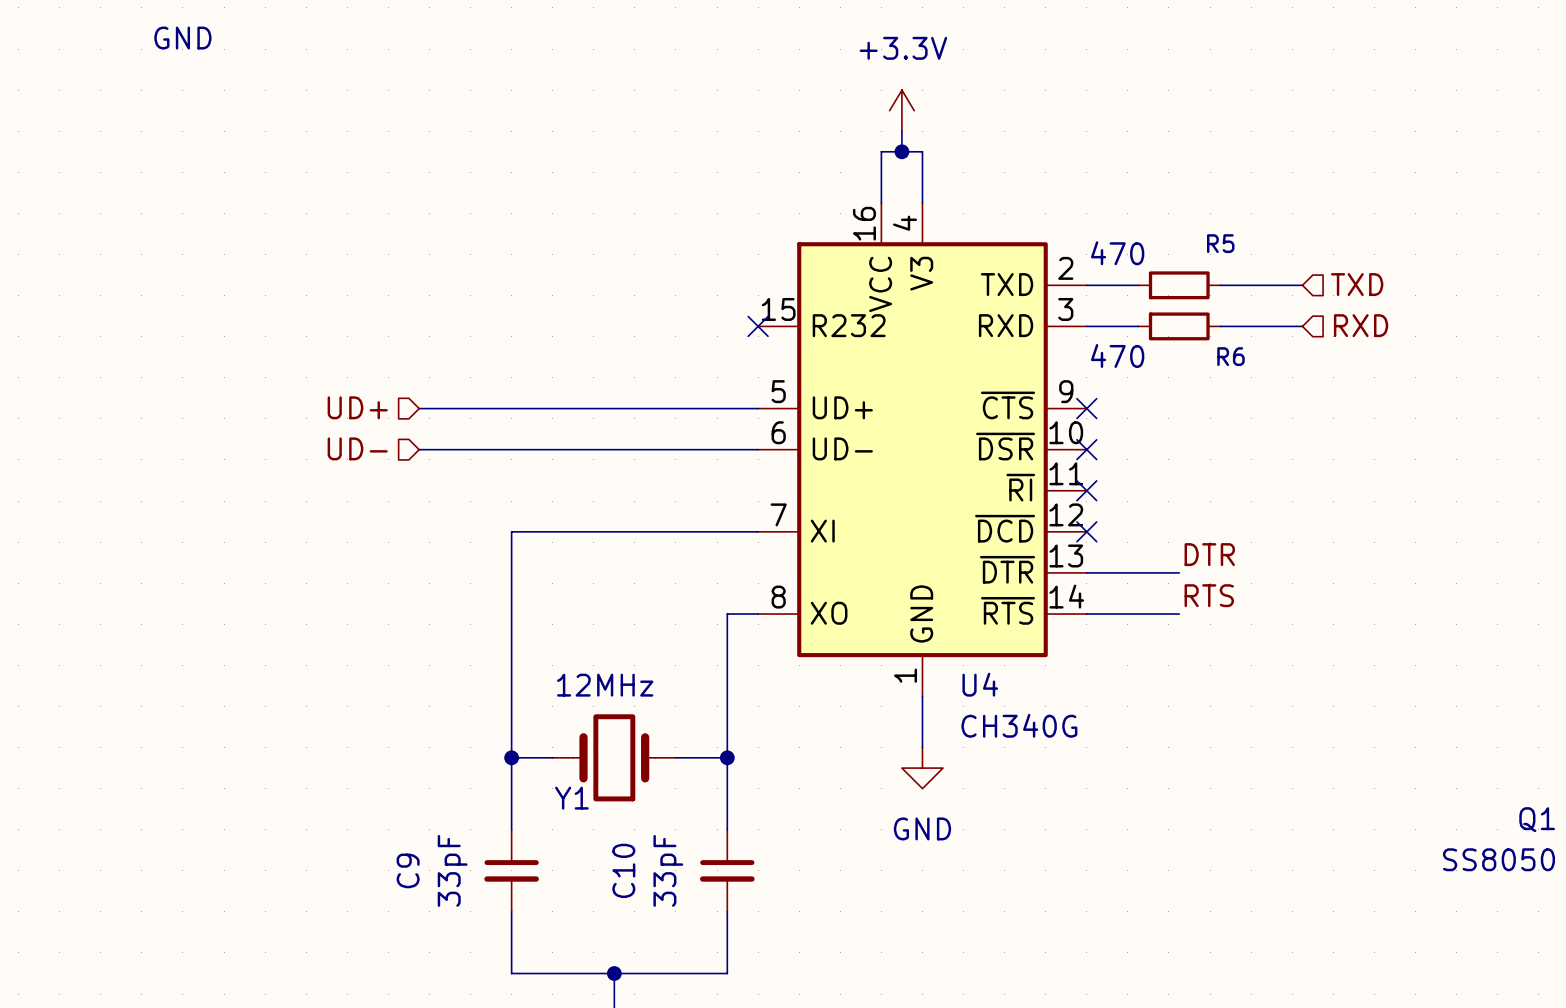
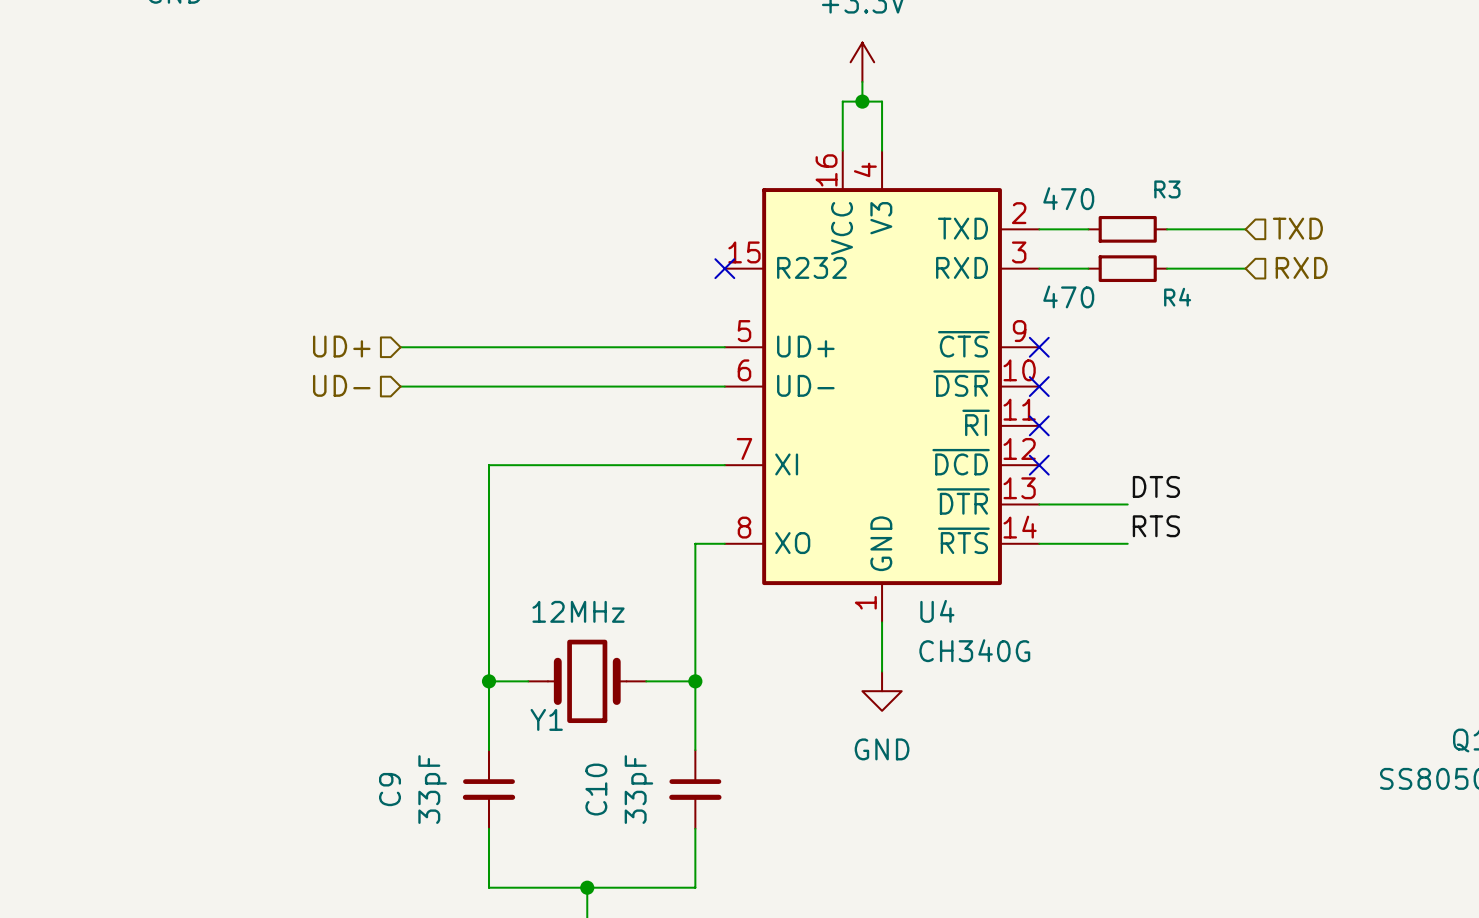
R5 name: R5 (1220, 243) -> R3 (1167, 189)
R6 name: R6 (1231, 356) -> R4 (1177, 297)
label: DTR (1209, 554) -> DTS (1156, 486)

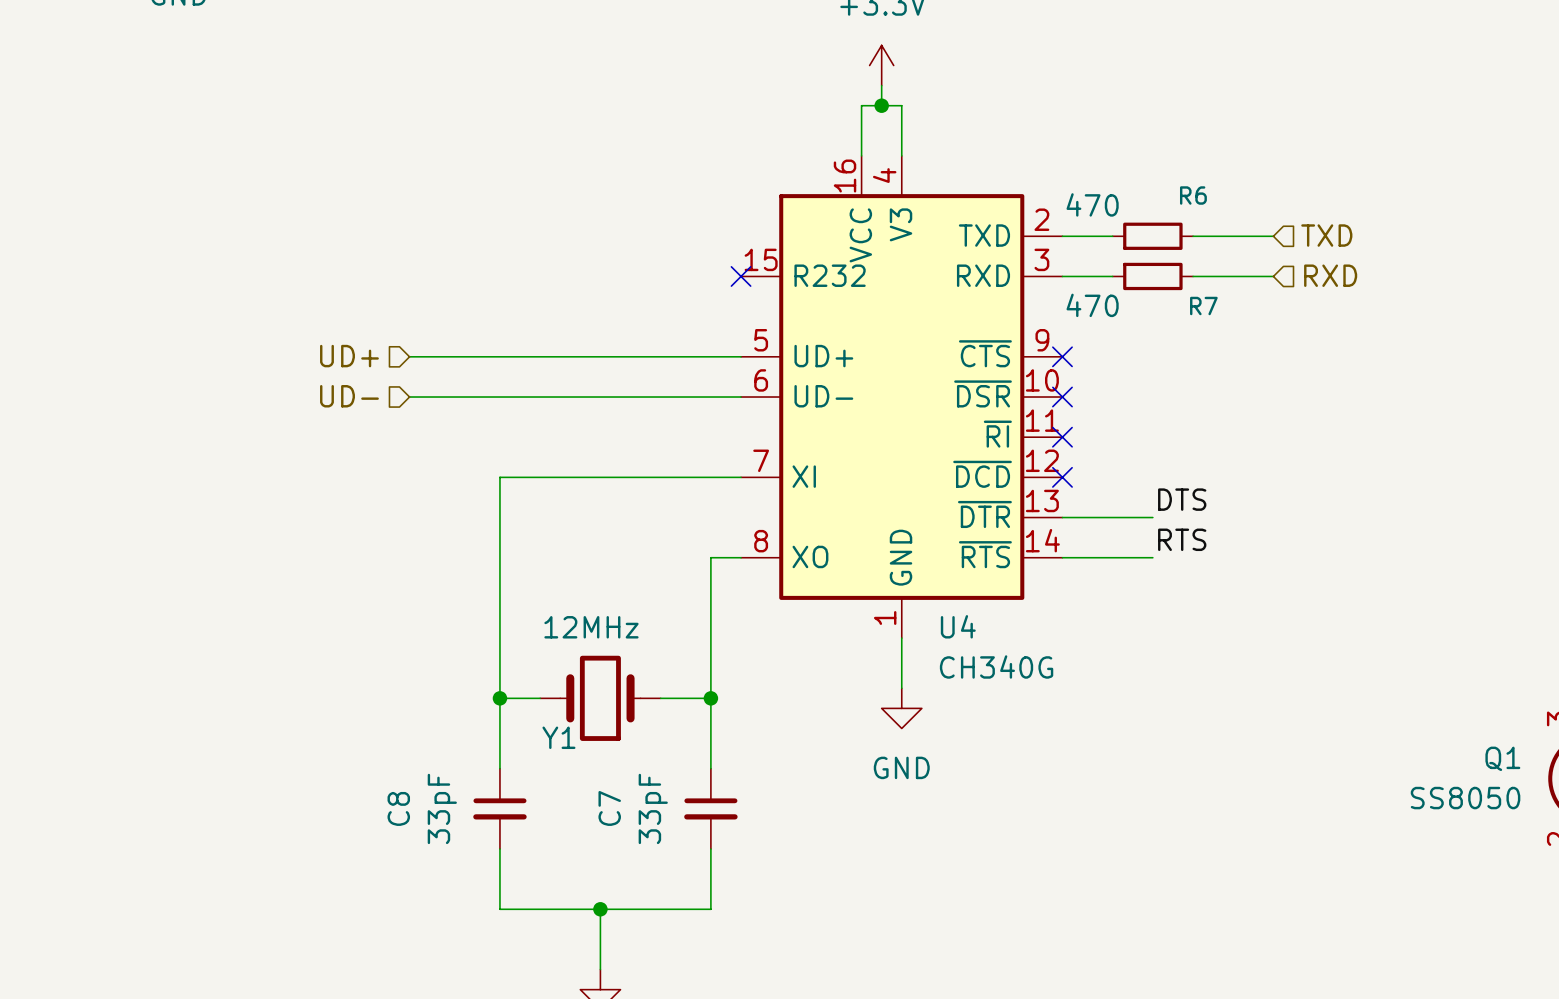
R3 name: R3 (1167, 189) -> R6 (1193, 195)
R4 name: R4 (1177, 297) -> R7 (1203, 306)
C9 name: C9 (390, 789) -> C8 (398, 808)
C10 name: C10 (596, 789) -> C7 (609, 808)

